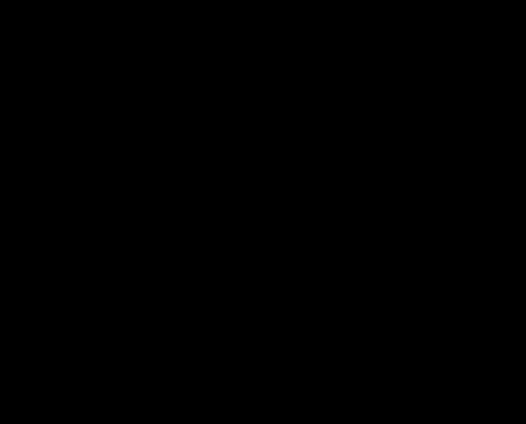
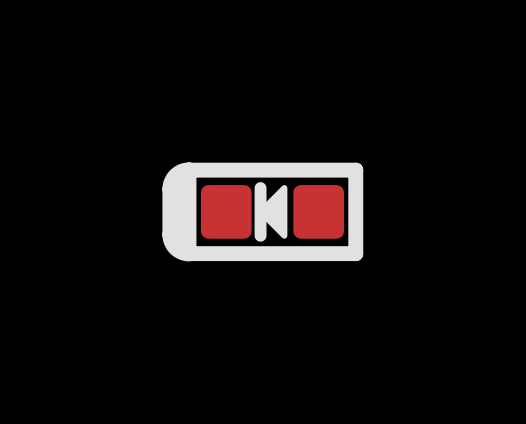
part: none -> (262, 211)

